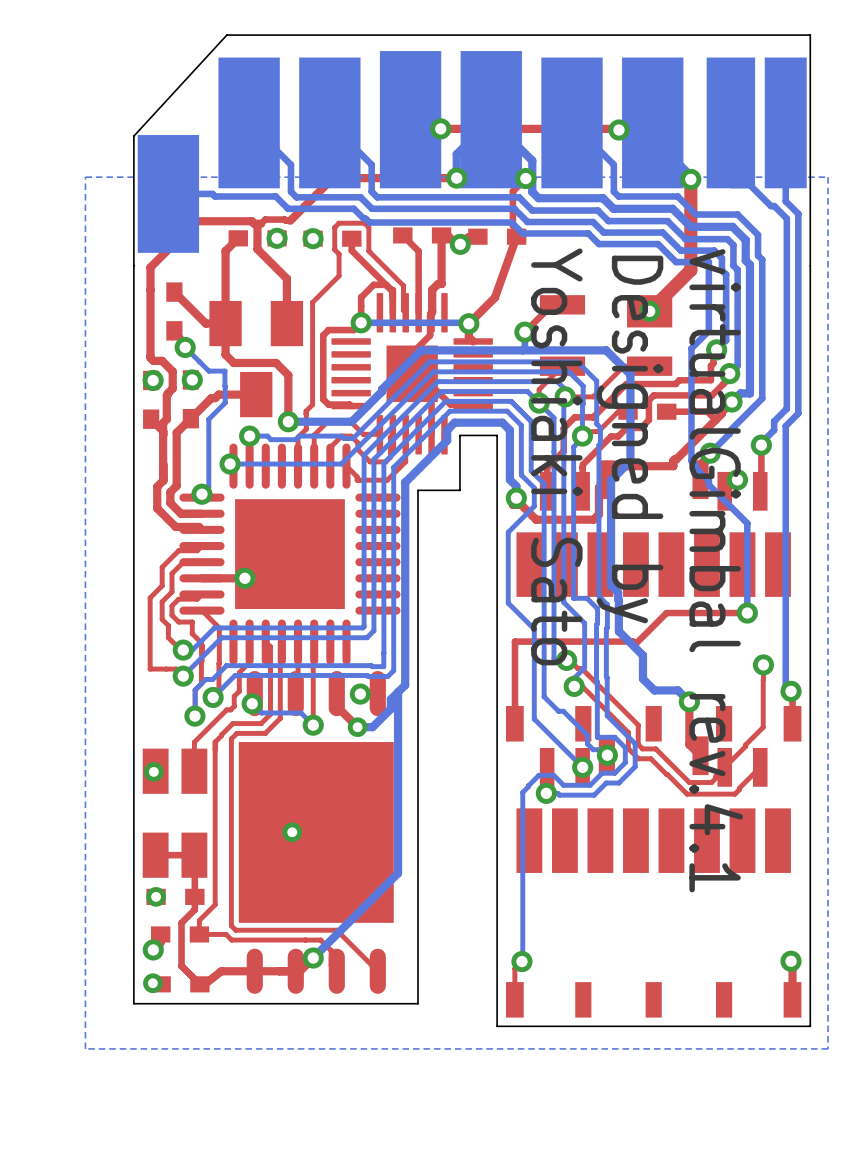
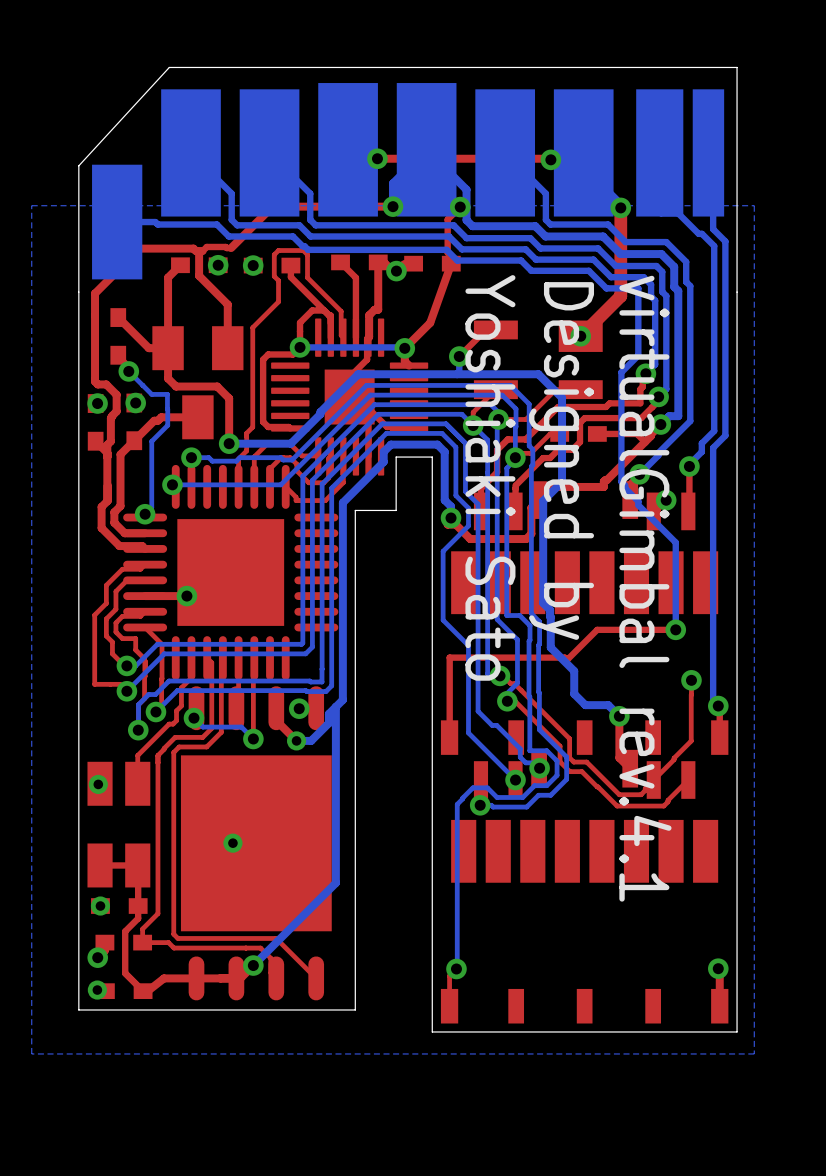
part footprint: [137, 51, 807, 253] -> [92, 83, 725, 280]

